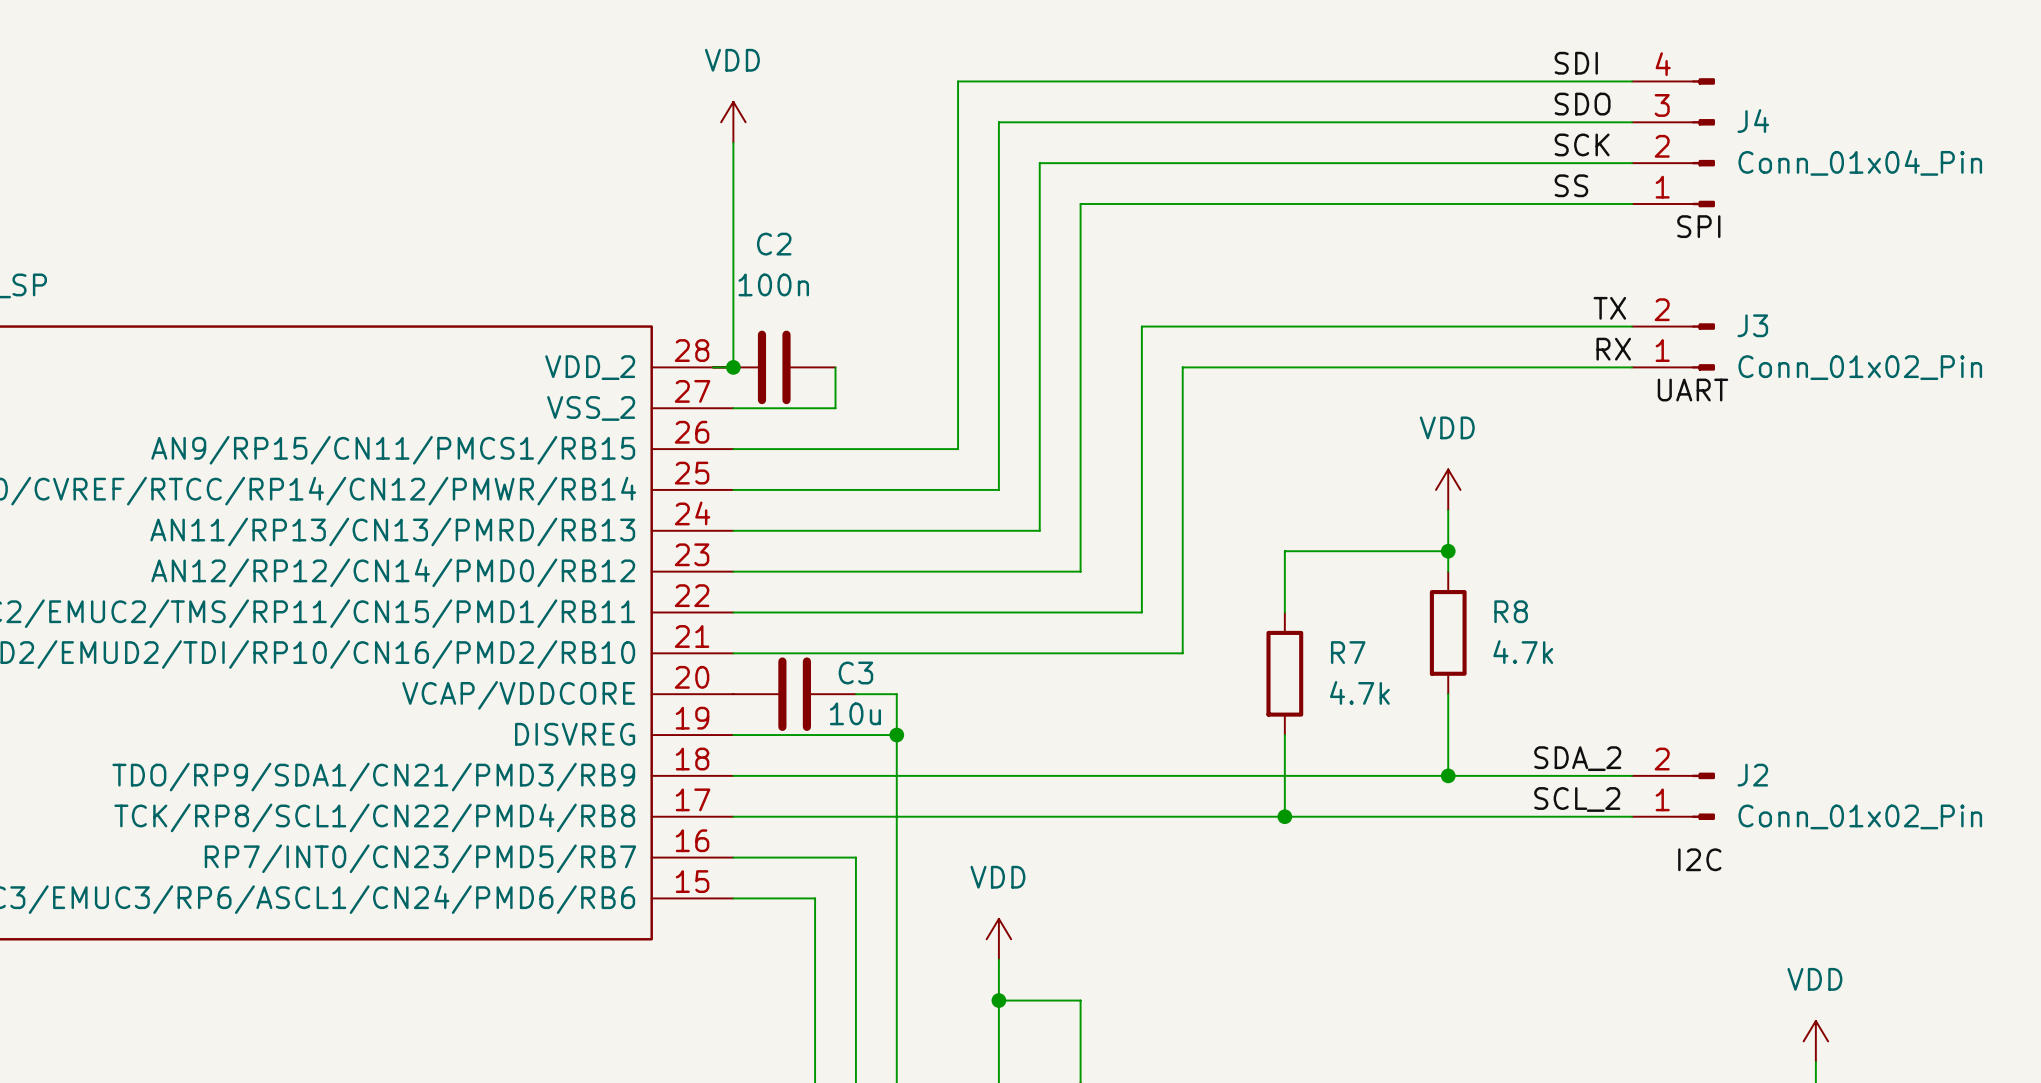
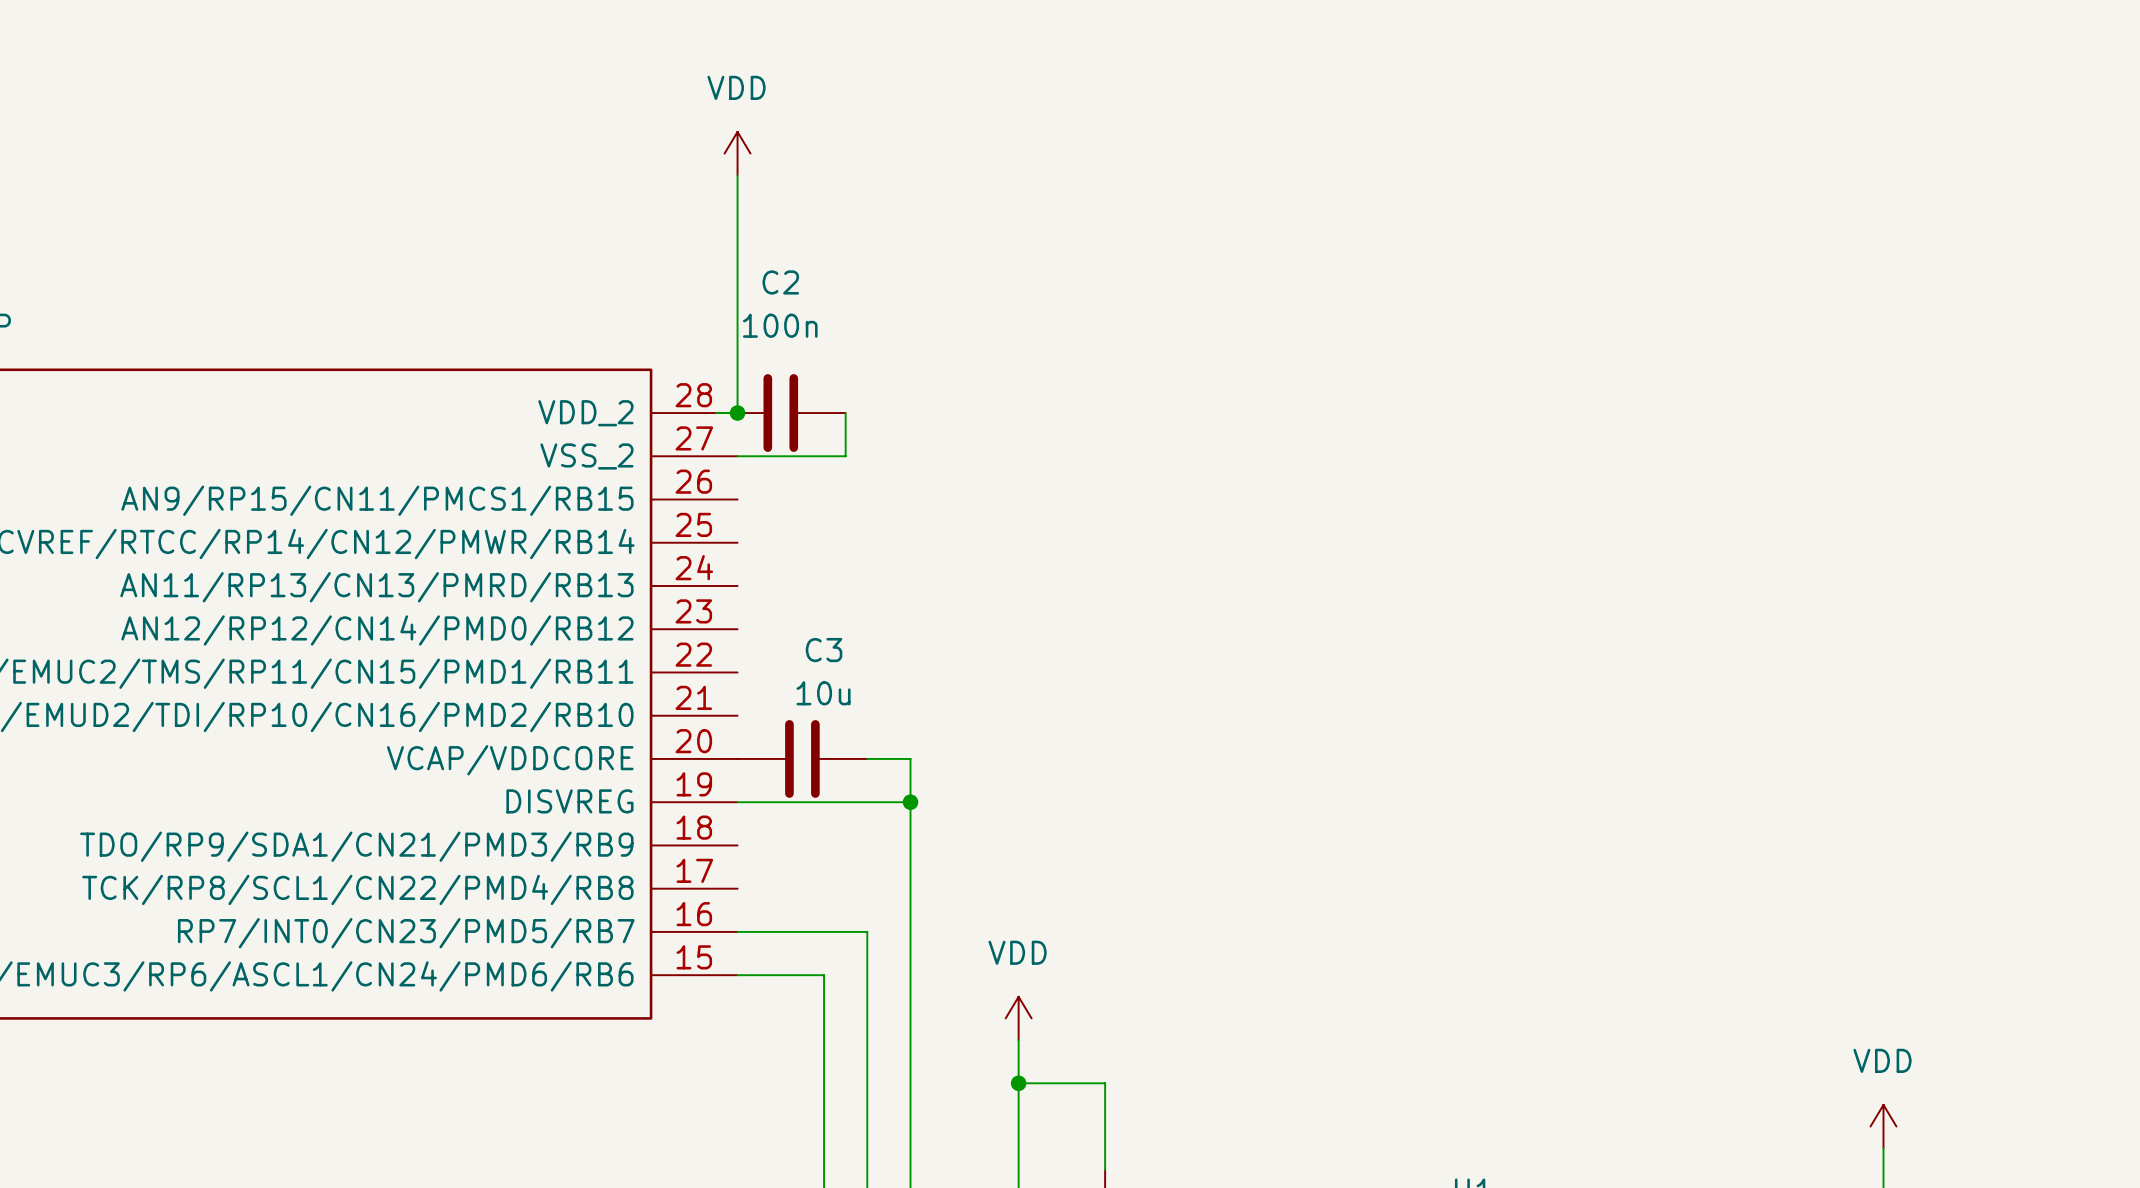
label: SDI (1576, 63) -> none
wire: (1632, 81) (958, 81) (958, 449) (733, 449) -> none
label: SDO (1582, 104) -> none
wire: (1632, 122) (998, 122) (998, 489) (733, 489) -> none
J4: Conn_01x04_Pin (1673, 142) -> none
label: SCK (1582, 144) -> none
wire: (1632, 163) (1039, 163) (1039, 530) (733, 530) -> none
label: SS (1571, 185) -> none
wire: (1632, 204) (1080, 204) (1080, 571) (733, 571) -> none
label: SPI (1698, 226) -> none
label: TX (1609, 308) -> none
wire: (1632, 326) (1141, 326) (1141, 612) (733, 612) -> none
J3: Conn_01x02_Pin (1673, 346) -> none
label: RX (1613, 349) -> none
wire: (1632, 367) (1182, 367) (1182, 653) (733, 653) -> none
label: UART (1692, 390) -> none
power symbol: VDD (1448, 489) -> none
wire: (1448, 510) (1448, 571) -> none
wire: (1448, 551) (1284, 551) (1284, 612) -> none
junction: (1448, 551) -> none
R8: 4.7k (1448, 632) -> none
C3 name position: C3 (855, 673) -> C3 (824, 650)
R7: 4.7k (1284, 673) -> none
wire: (1448, 694) (1448, 775) -> none
C3 value position: 10u (855, 713) -> 10u (823, 693)
wire: (1284, 735) (1284, 816) -> none
label: SDA_2 (1577, 758) -> none
wire: (733, 775) (1632, 775) -> none
junction: (1448, 775) -> none
J2: Conn_01x02_Pin (1673, 796) -> none
label: SCL_2 (1577, 799) -> none
wire: (733, 816) (1632, 816) -> none
junction: (1284, 816) -> none
label: I2C (1699, 859) -> none

